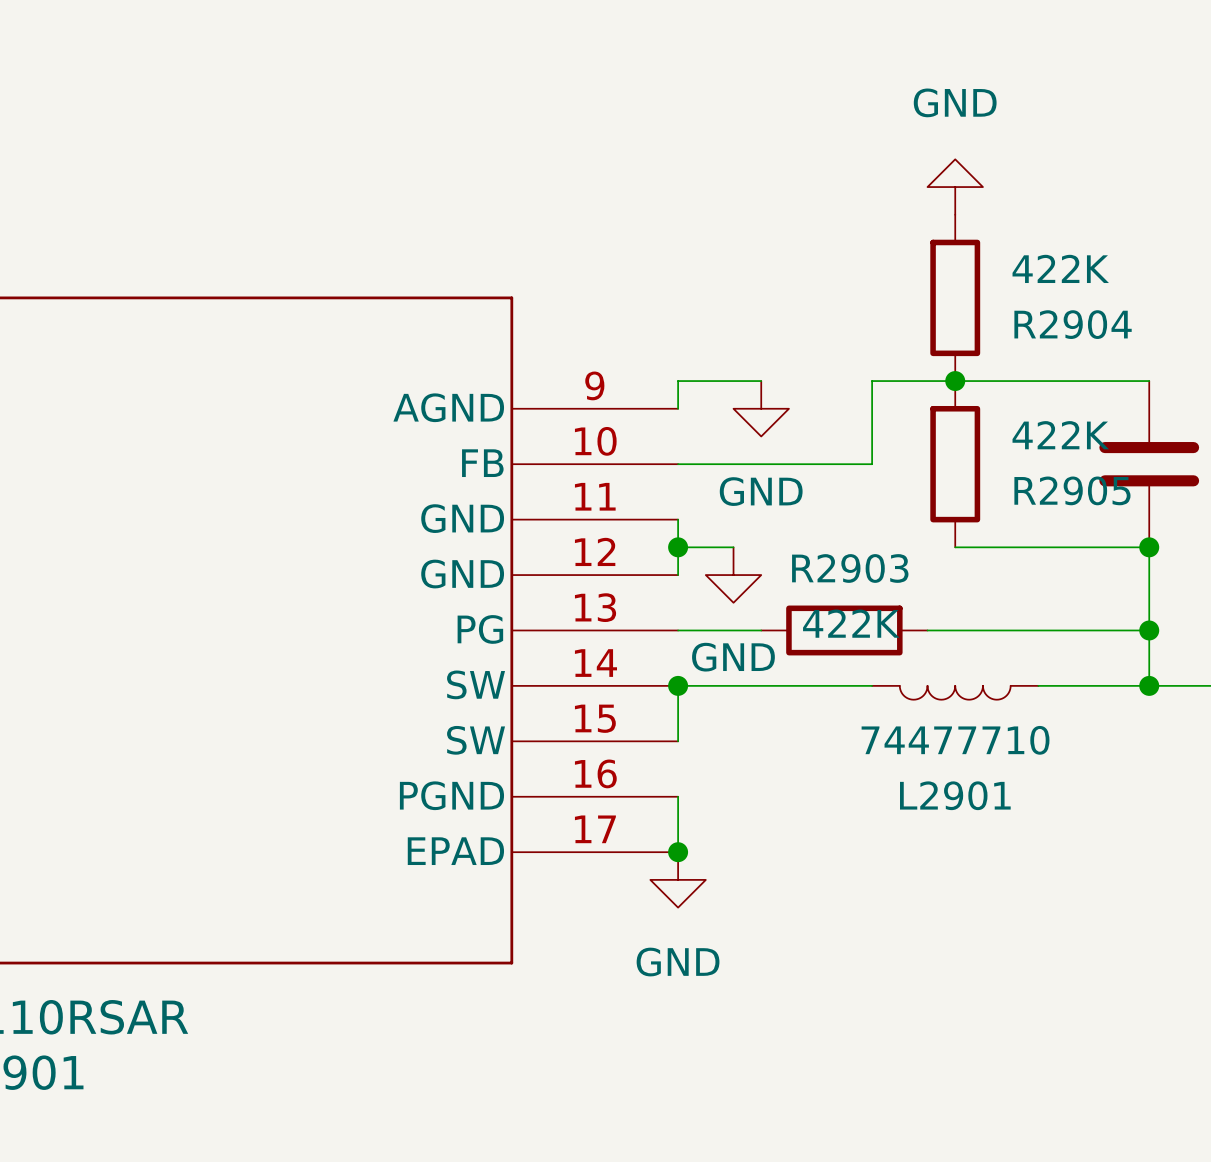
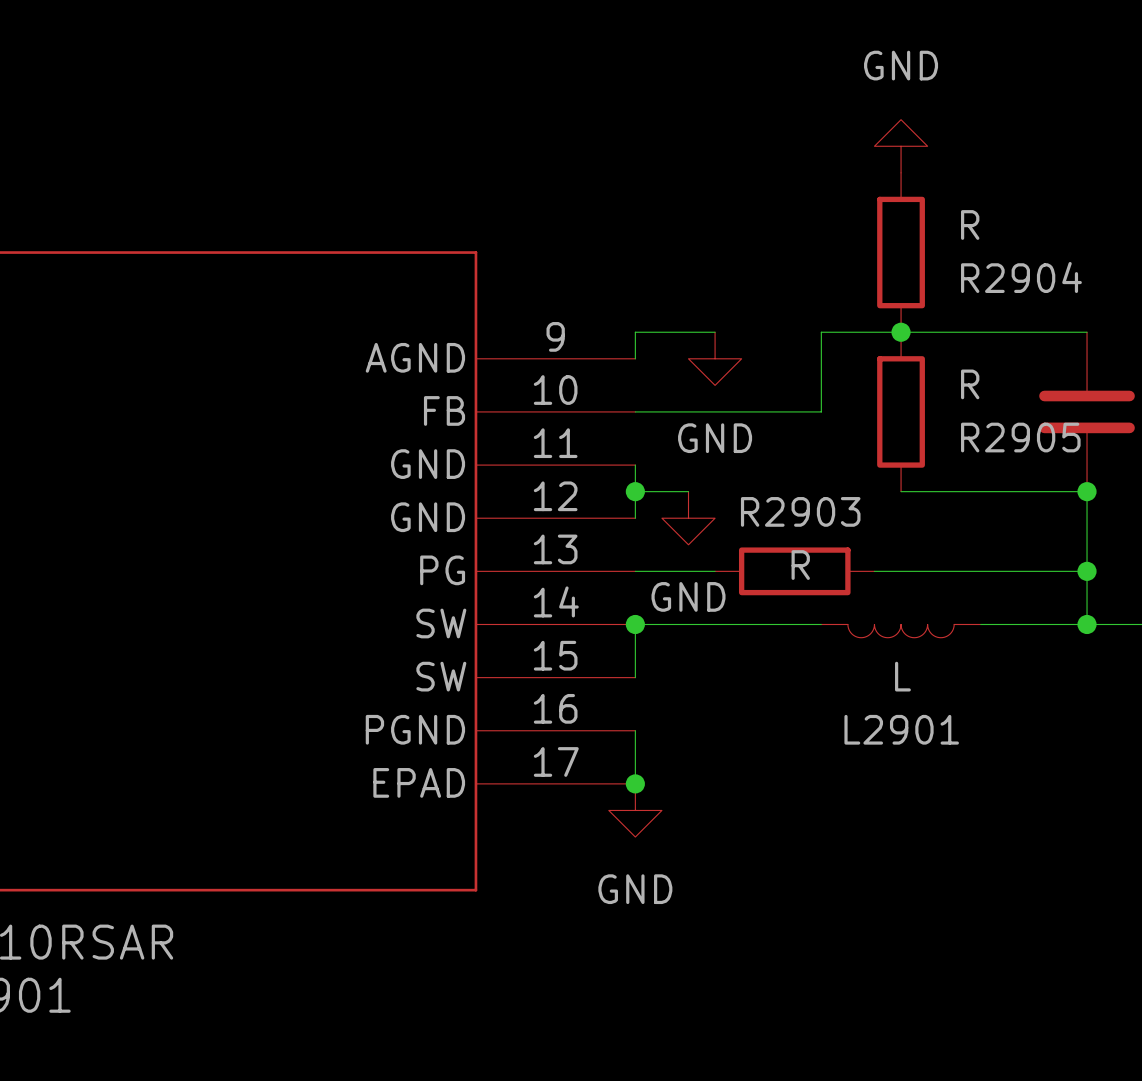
R2904 value: 422K (1060, 268) -> R (970, 224)
R2905 value: 422K (1060, 435) -> R (970, 384)
R2903 value: 422K (851, 623) -> R (800, 565)
L2901 value: 74477710 (955, 740) -> L (902, 676)

